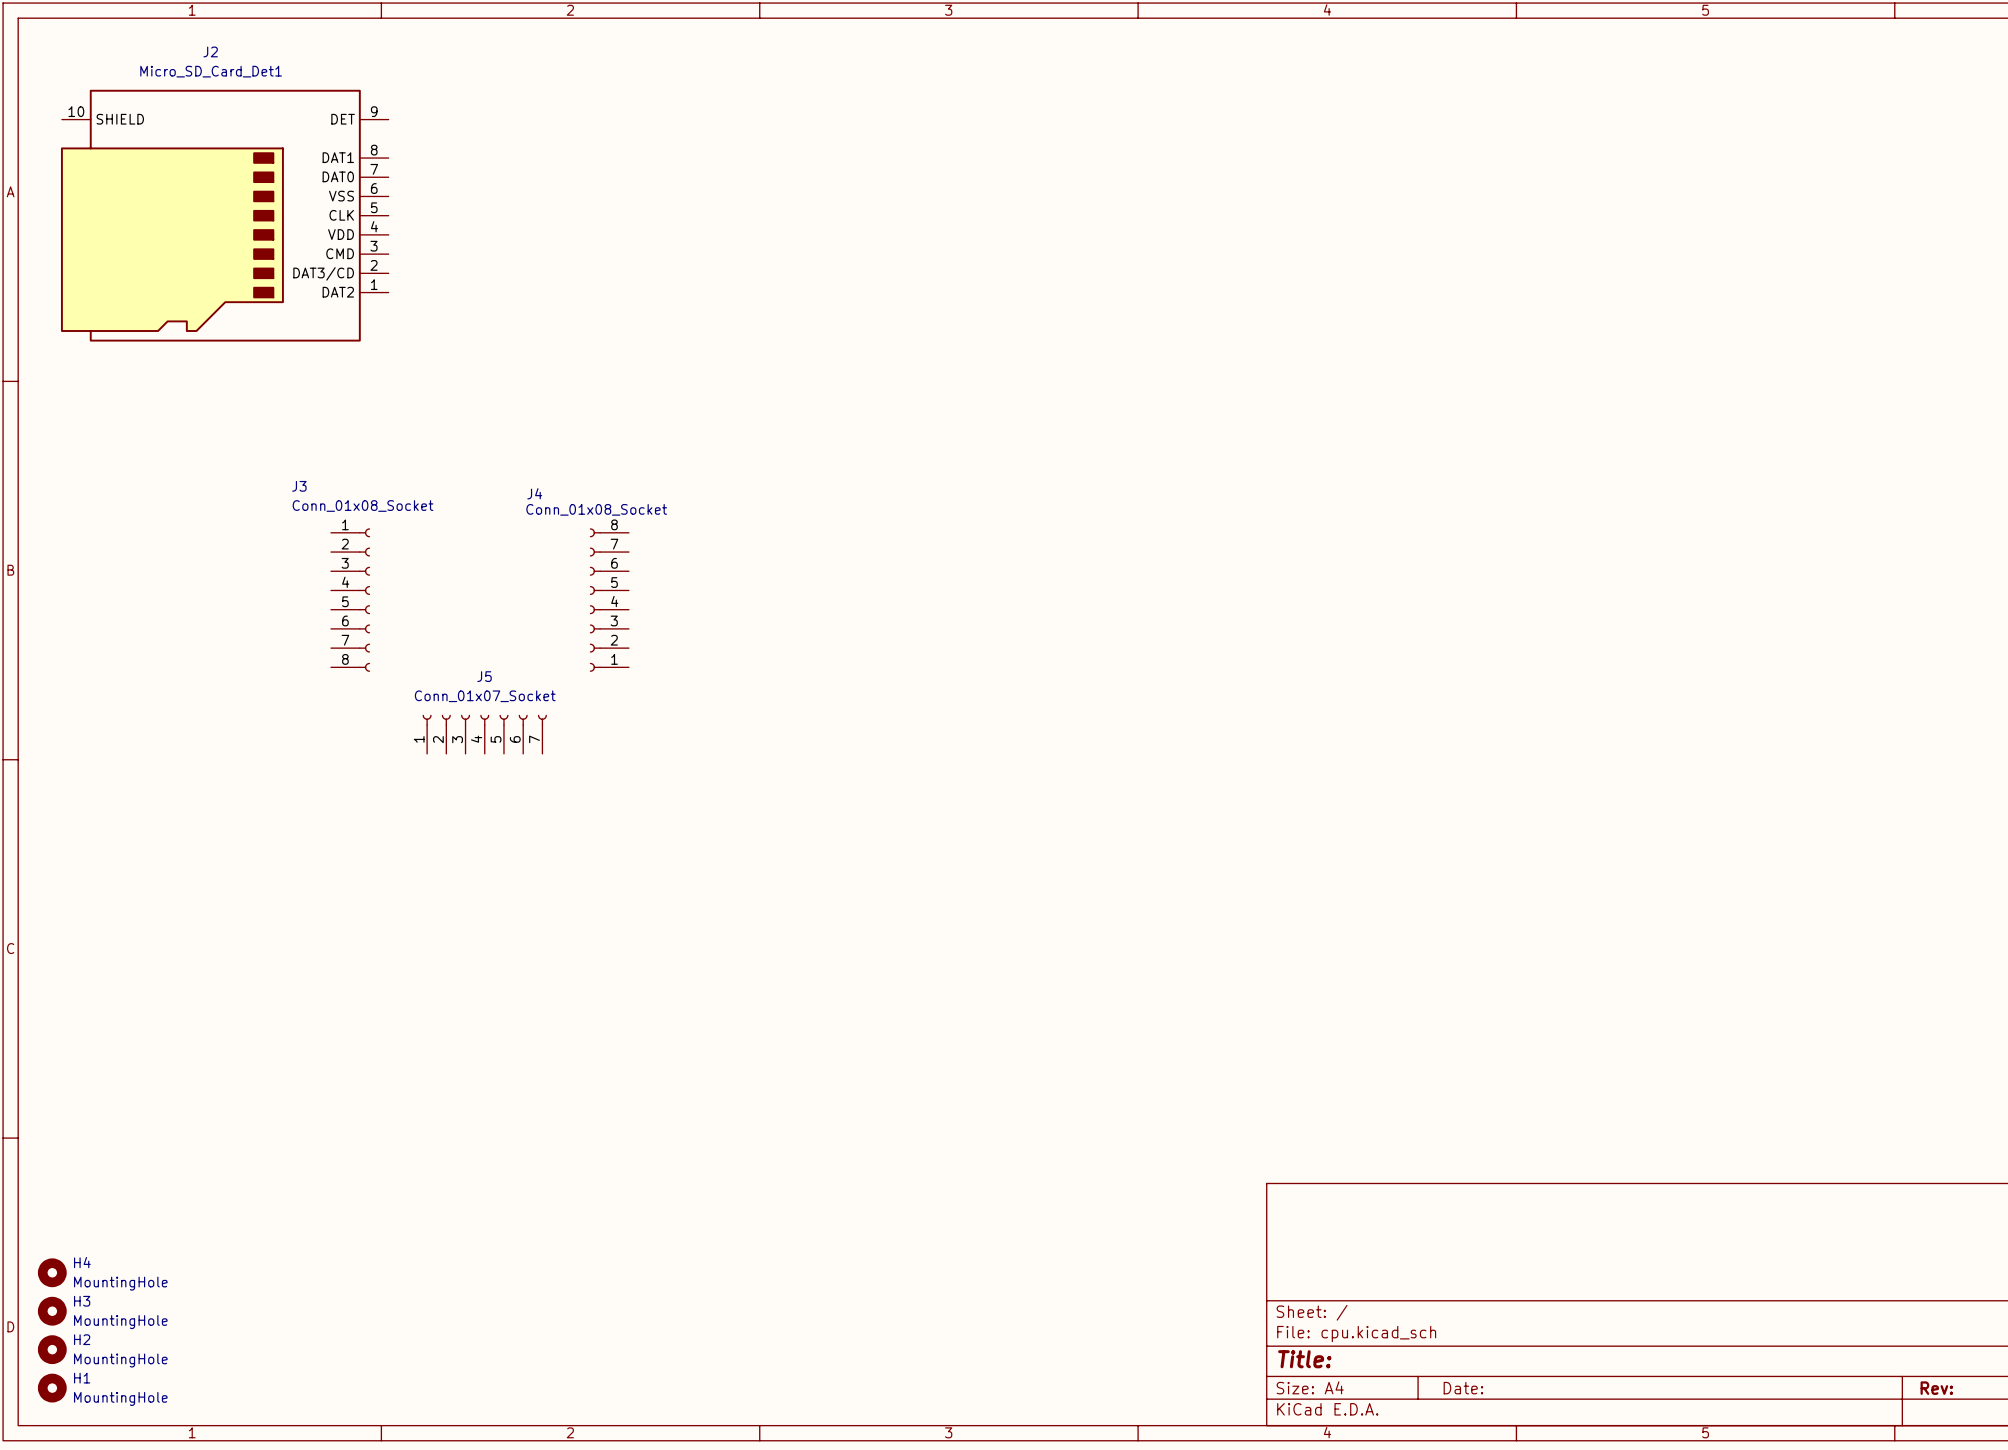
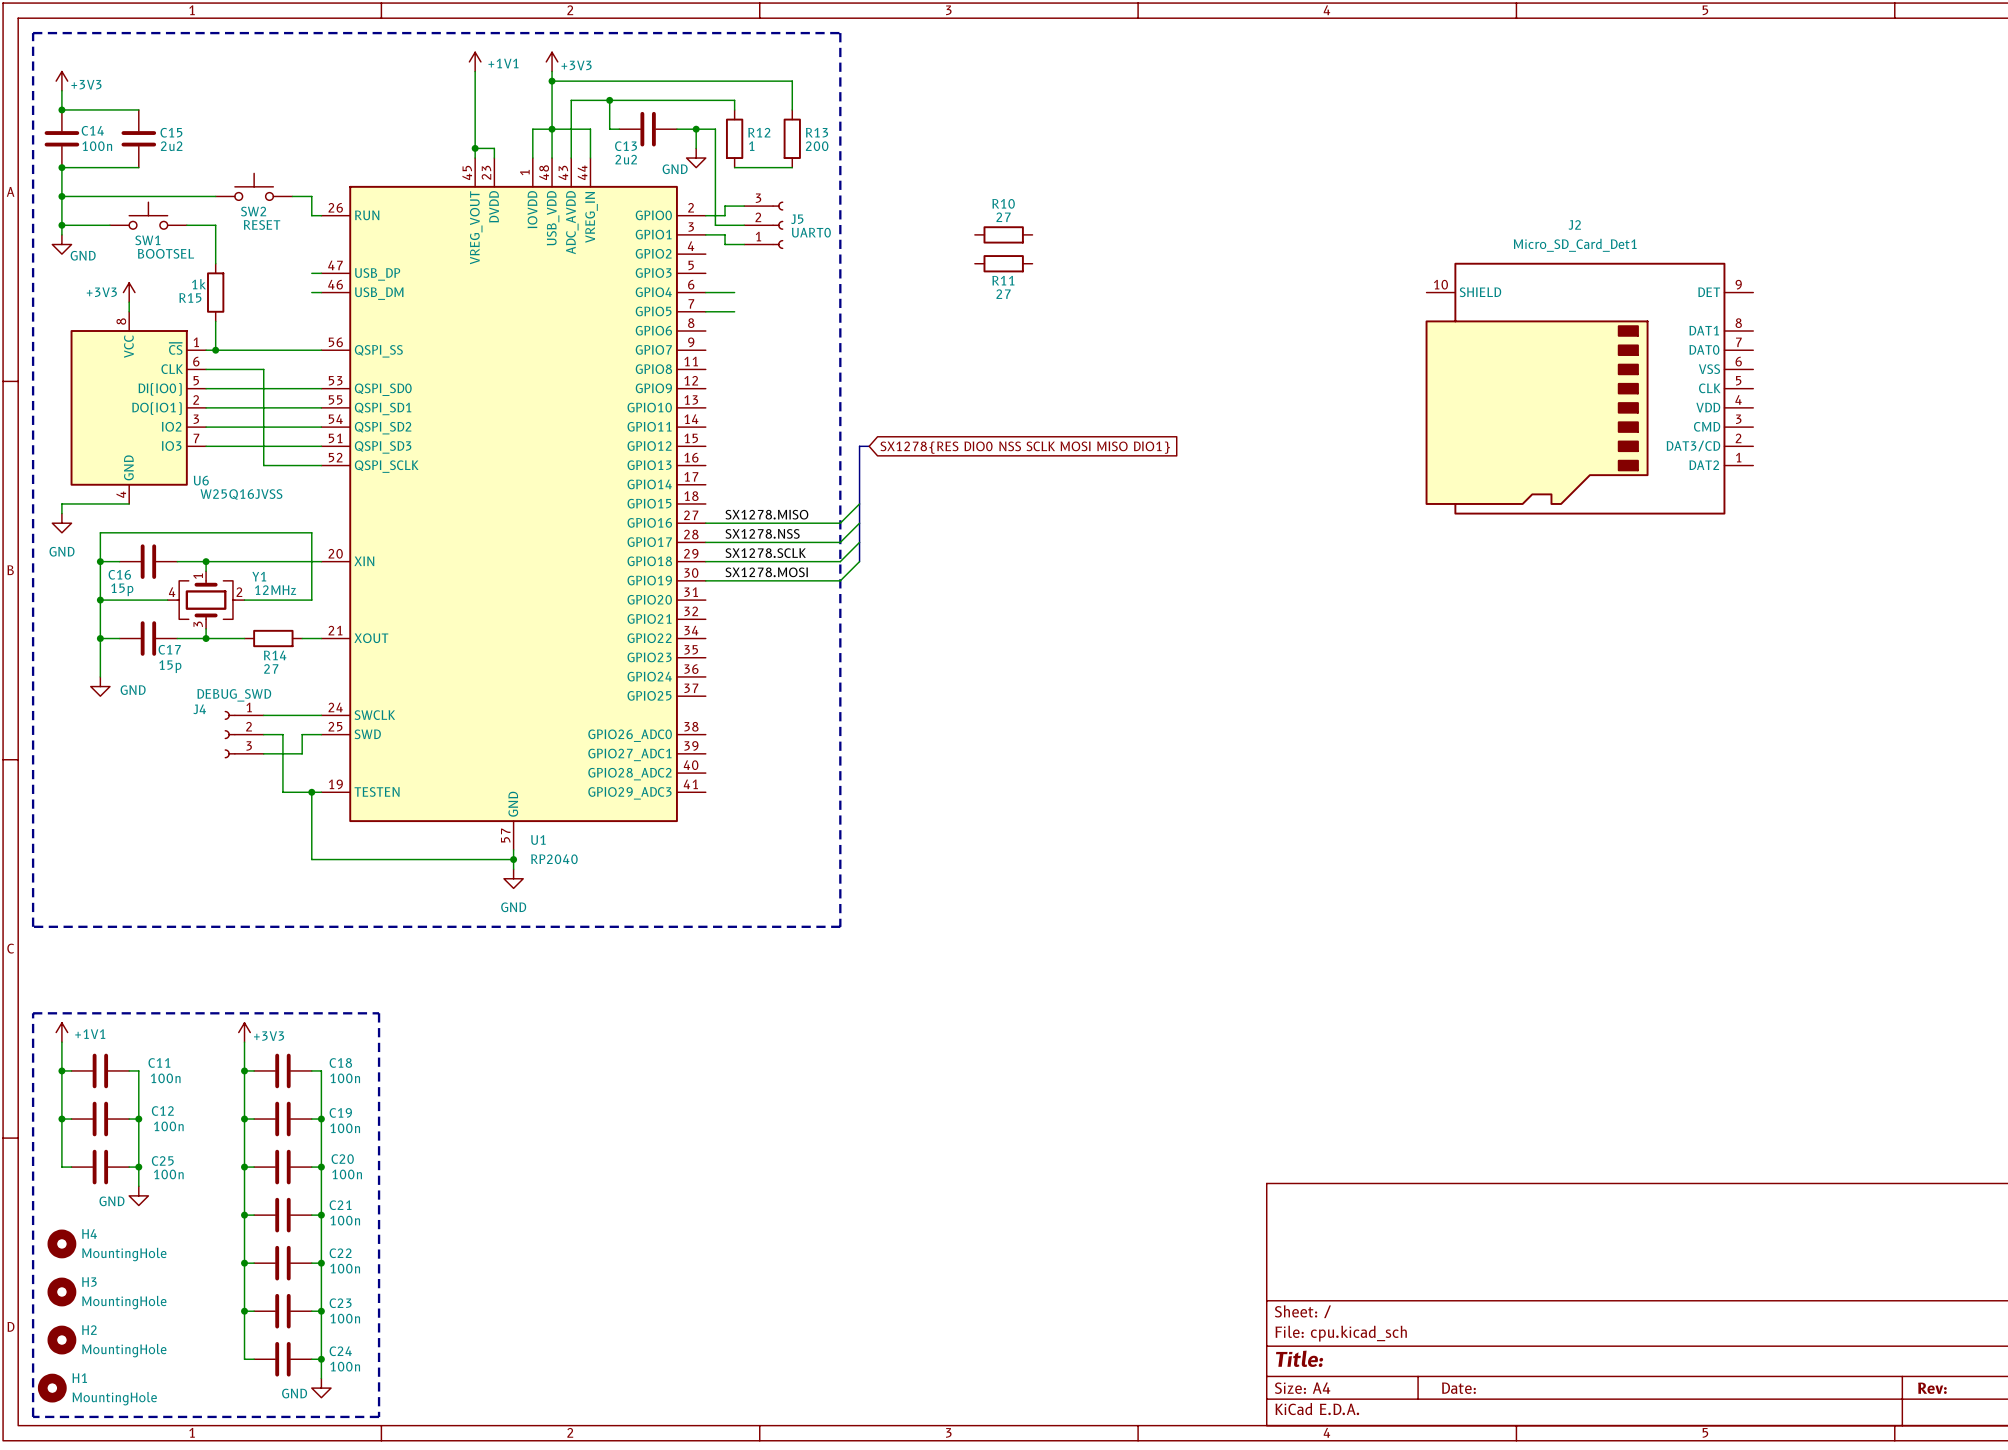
line: none -> (33, 33) (840, 33) (840, 926) (33, 926) (33, 33)
power symbol: none -> +1V1 (475, 61)
power symbol: none -> +3V3 (552, 61)
wire: none -> (475, 71) (475, 158)
wire: none -> (552, 71) (552, 158)
power symbol: none -> +3V3 (61, 81)
wire: none -> (552, 81) (792, 81) (792, 109)
junction: none -> (552, 81)
wire: none -> (61, 90) (61, 109) (138, 109)
wire: none -> (609, 100) (609, 129) (619, 129)
junction: none -> (609, 100)
junction: none -> (61, 109)
wire: none -> (734, 109) (734, 100) (571, 100) (571, 158)
junction: none -> (552, 129)
C13: none -> 2u2 (648, 129)
wire: none -> (676, 129) (715, 129) (715, 225) (744, 225)
wire: none -> (696, 129) (696, 148)
junction: none -> (696, 129)
C14: none -> 100n (61, 138)
C15: none -> 2u2 (138, 138)
R12: none -> 1 (734, 138)
R13: none -> 200 (792, 138)
wire: none -> (475, 148) (494, 148) (494, 158)
junction: none -> (475, 148)
wire: none -> (532, 158) (532, 129) (590, 129) (590, 158)
power symbol: none -> GND (696, 158)
junction: none -> (61, 167)
wire: none -> (734, 167) (792, 167)
SW2: none -> RESET (254, 186)
junction: none -> (61, 196)
wire: none -> (292, 196) (311, 196) (311, 215) (321, 215)
wire: none -> (744, 206) (725, 206) (725, 215) (705, 215)
SW1: none -> BOOTSEL (148, 215)
J2 position: (224, 215) -> (1589, 388)
junction: none -> (61, 225)
wire: none -> (705, 234) (725, 234) (725, 244) (744, 244)
R10: none -> 27 (1003, 234)
power symbol: none -> GND (61, 244)
R11: none -> 27 (1003, 263)
wire: none -> (311, 273) (321, 273)
power symbol: none -> +3V3 (129, 292)
R15: none -> 1k (215, 292)
wire: none -> (311, 292) (321, 292)
wire: none -> (705, 292) (734, 292)
wire: none -> (705, 311) (734, 311)
wire: none -> (215, 321) (215, 350)
wire: none -> (206, 350) (321, 350)
junction: none -> (215, 350)
wire: none -> (206, 369) (263, 369) (263, 465) (321, 465)
wire: none -> (206, 388) (321, 388)
U6: none -> W25Q16JVSS (138, 407)
wire: none -> (206, 407) (321, 407)
wire: none -> (206, 427) (321, 427)
wire: none -> (206, 446) (321, 446)
bus: none -> (869, 446) (859, 446) (859, 561)
global label: none -> SX1278{RES DIO0 NSS SCLK MOSI MISO DIO1} (1025, 447)
J4 name position: J4 (534, 493) -> J4 (199, 709)
wire: none -> (129, 503) (61, 503) (61, 513)
U1: none -> RP2040 (513, 503)
wire: none -> (859, 503) (840, 523) (705, 523)
J4 value: Conn_01x08_Socket (596, 509) -> DEBUG_SWD (234, 695)
label: none -> SX1278.MISO (766, 514)
power symbol: none -> GND (61, 523)
wire: none -> (859, 523) (840, 542) (705, 542)
J4 symbol: [589, 528, 629, 672] -> [224, 710, 264, 759]
label: none -> SX1278.NSS (762, 533)
wire: none -> (859, 542) (840, 561) (705, 561)
label: none -> SX1278.SCLK (765, 553)
wire: none -> (100, 561) (119, 561)
junction: none -> (100, 561)
C16: none -> 15p (148, 561)
wire: none -> (177, 561) (321, 561)
wire: none -> (206, 561) (206, 571)
junction: none -> (206, 561)
wire: none -> (859, 561) (840, 580) (705, 580)
label: none -> SX1278.MOSI (766, 572)
wire: none -> (100, 600) (167, 600)
junction: none -> (100, 600)
Y1: none -> 12MHz (206, 600)
wire: none -> (244, 600) (311, 600) (311, 532) (100, 532) (100, 676)
J3: Conn_01x08_Socket (350, 600) -> none
wire: none -> (206, 628) (206, 638)
wire: none -> (100, 638) (119, 638)
junction: none -> (100, 638)
C17: none -> 15p (148, 638)
wire: none -> (177, 638) (244, 638)
junction: none -> (206, 638)
R14: none -> 27 (273, 638)
wire: none -> (302, 638) (321, 638)
J5 name position: J5 (484, 676) -> J5 (797, 219)
power symbol: none -> GND (100, 686)
J5 value: Conn_01x07_Socket (485, 696) -> UART0 (811, 232)
J5 symbol: [422, 714, 547, 754] -> [744, 201, 784, 249]
wire: none -> (263, 715) (321, 715)
wire: none -> (263, 734) (282, 734) (282, 792) (321, 792)
wire: none -> (321, 734) (302, 734) (302, 753) (263, 753)
wire: none -> (311, 792) (311, 859) (513, 859)
junction: none -> (311, 792)
wire: none -> (513, 849) (513, 869)
junction: none -> (513, 859)
power symbol: none -> GND (513, 878)
line: none -> (33, 1013) (33, 1416) (379, 1416) (379, 1013) (33, 1013)
power symbol: none -> +1V1 (61, 1032)
power symbol: none -> +3V3 (244, 1032)
wire: none -> (61, 1042) (61, 1167) (71, 1167)
wire: none -> (244, 1042) (244, 1359) (254, 1359)
wire: none -> (61, 1070) (71, 1070)
junction: none -> (61, 1070)
C11: none -> 100n (100, 1070)
wire: none -> (129, 1070) (138, 1070) (138, 1186)
wire: none -> (244, 1070) (254, 1070)
junction: none -> (244, 1070)
C18: none -> 100n (282, 1070)
wire: none -> (311, 1070) (321, 1070) (321, 1378)
wire: none -> (61, 1119) (71, 1119)
junction: none -> (61, 1119)
C12: none -> 100n (100, 1119)
wire: none -> (129, 1119) (138, 1119)
junction: none -> (138, 1119)
wire: none -> (244, 1119) (254, 1119)
junction: none -> (244, 1119)
C19: none -> 100n (282, 1119)
wire: none -> (311, 1119) (321, 1119)
junction: none -> (321, 1119)
C25: none -> 100n (100, 1167)
wire: none -> (129, 1167) (138, 1167)
junction: none -> (138, 1167)
wire: none -> (244, 1167) (254, 1167)
junction: none -> (244, 1167)
C20: none -> 100n (282, 1167)
wire: none -> (311, 1167) (321, 1167)
junction: none -> (321, 1167)
power symbol: none -> GND (138, 1195)
wire: none -> (244, 1215) (254, 1215)
junction: none -> (244, 1215)
C21: none -> 100n (282, 1215)
wire: none -> (311, 1215) (321, 1215)
junction: none -> (321, 1215)
wire: none -> (244, 1263) (254, 1263)
junction: none -> (244, 1263)
C22: none -> 100n (282, 1263)
wire: none -> (311, 1263) (321, 1263)
junction: none -> (321, 1263)
H4 position: (52, 1272) -> (61, 1243)
H3 position: (52, 1311) -> (61, 1291)
wire: none -> (244, 1311) (254, 1311)
junction: none -> (244, 1311)
C23: none -> 100n (282, 1311)
wire: none -> (311, 1311) (321, 1311)
junction: none -> (321, 1311)
H2 position: (52, 1349) -> (61, 1340)
C24: none -> 100n (282, 1359)
wire: none -> (311, 1359) (321, 1359)
junction: none -> (321, 1359)
power symbol: none -> GND (321, 1388)

